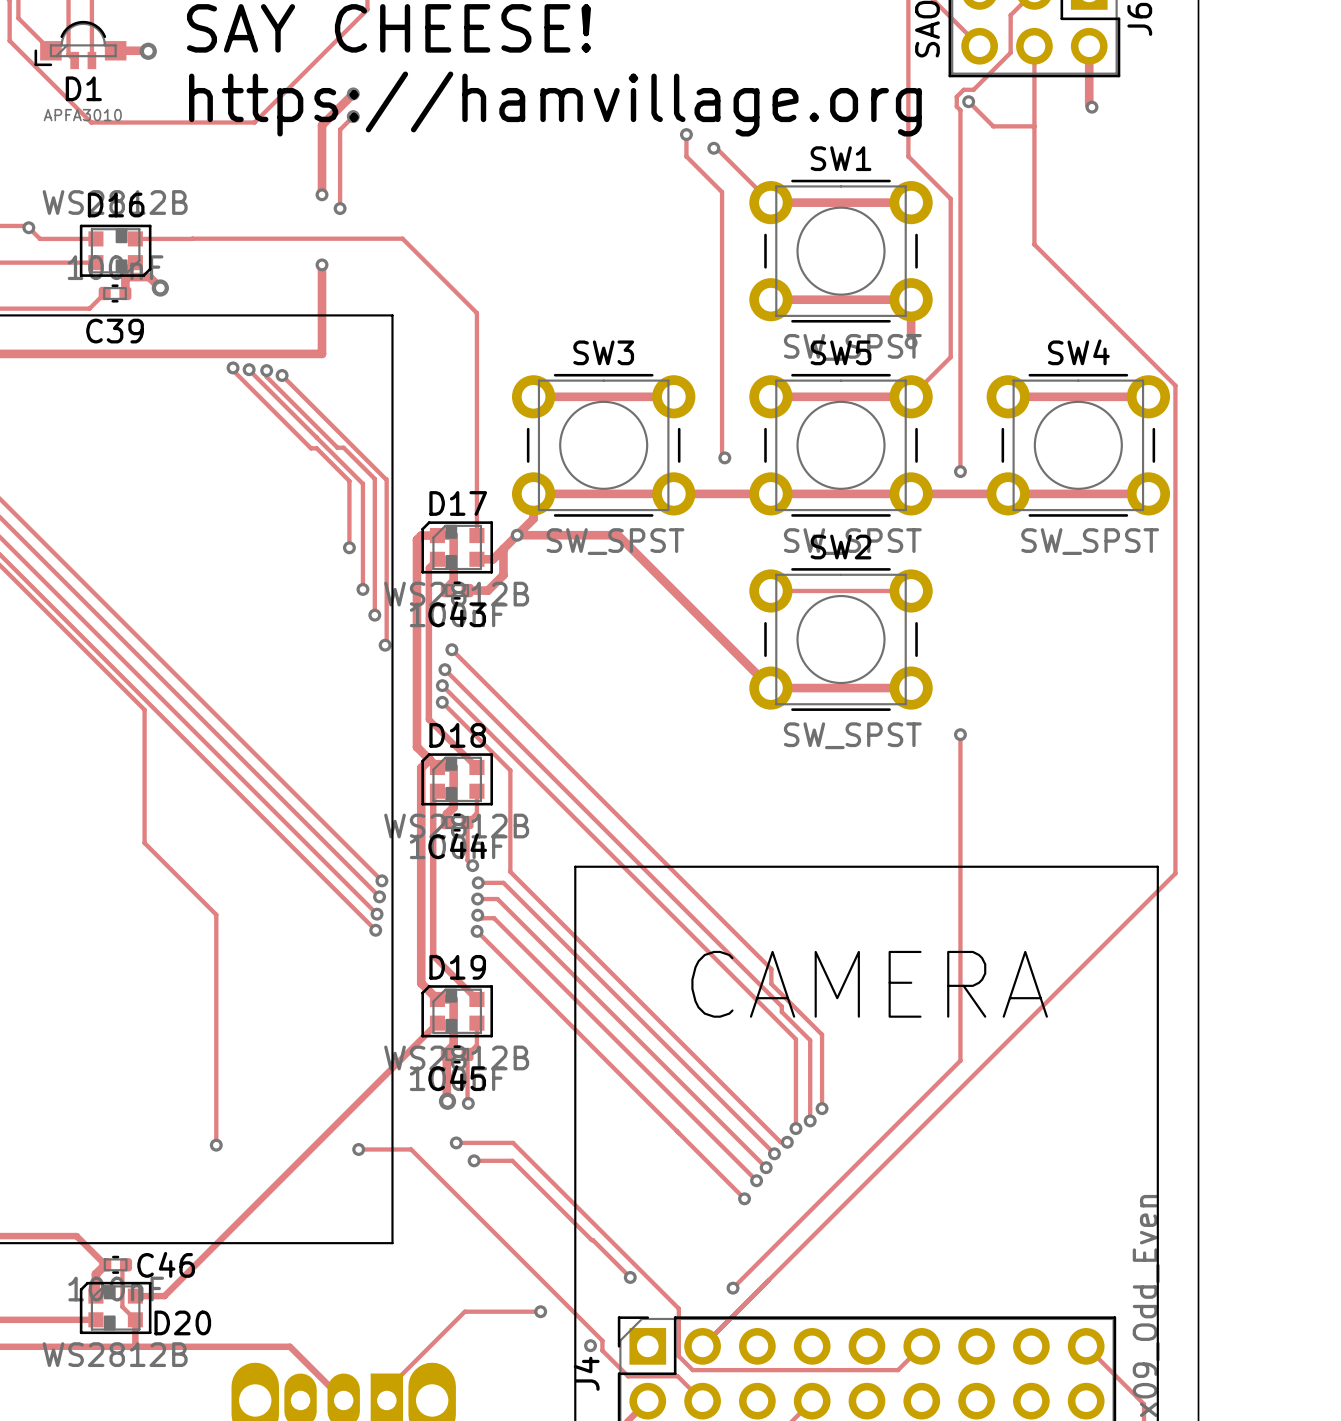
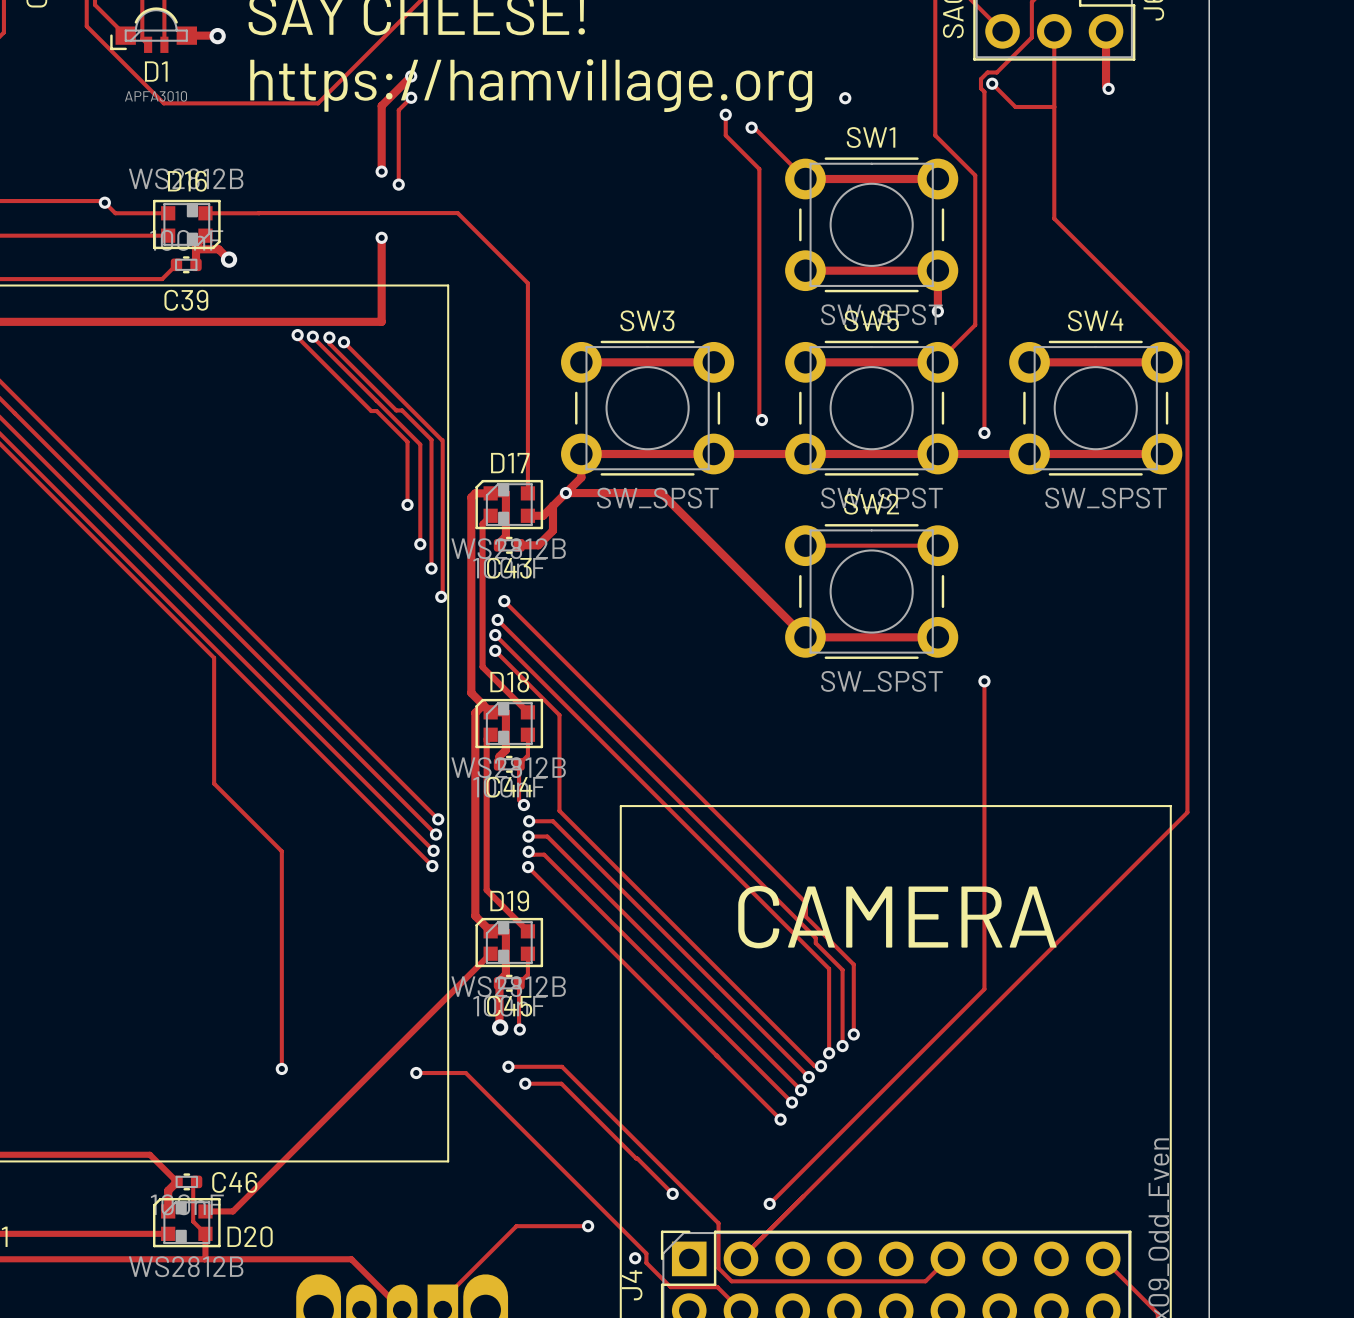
via: none -> (845, 98)

